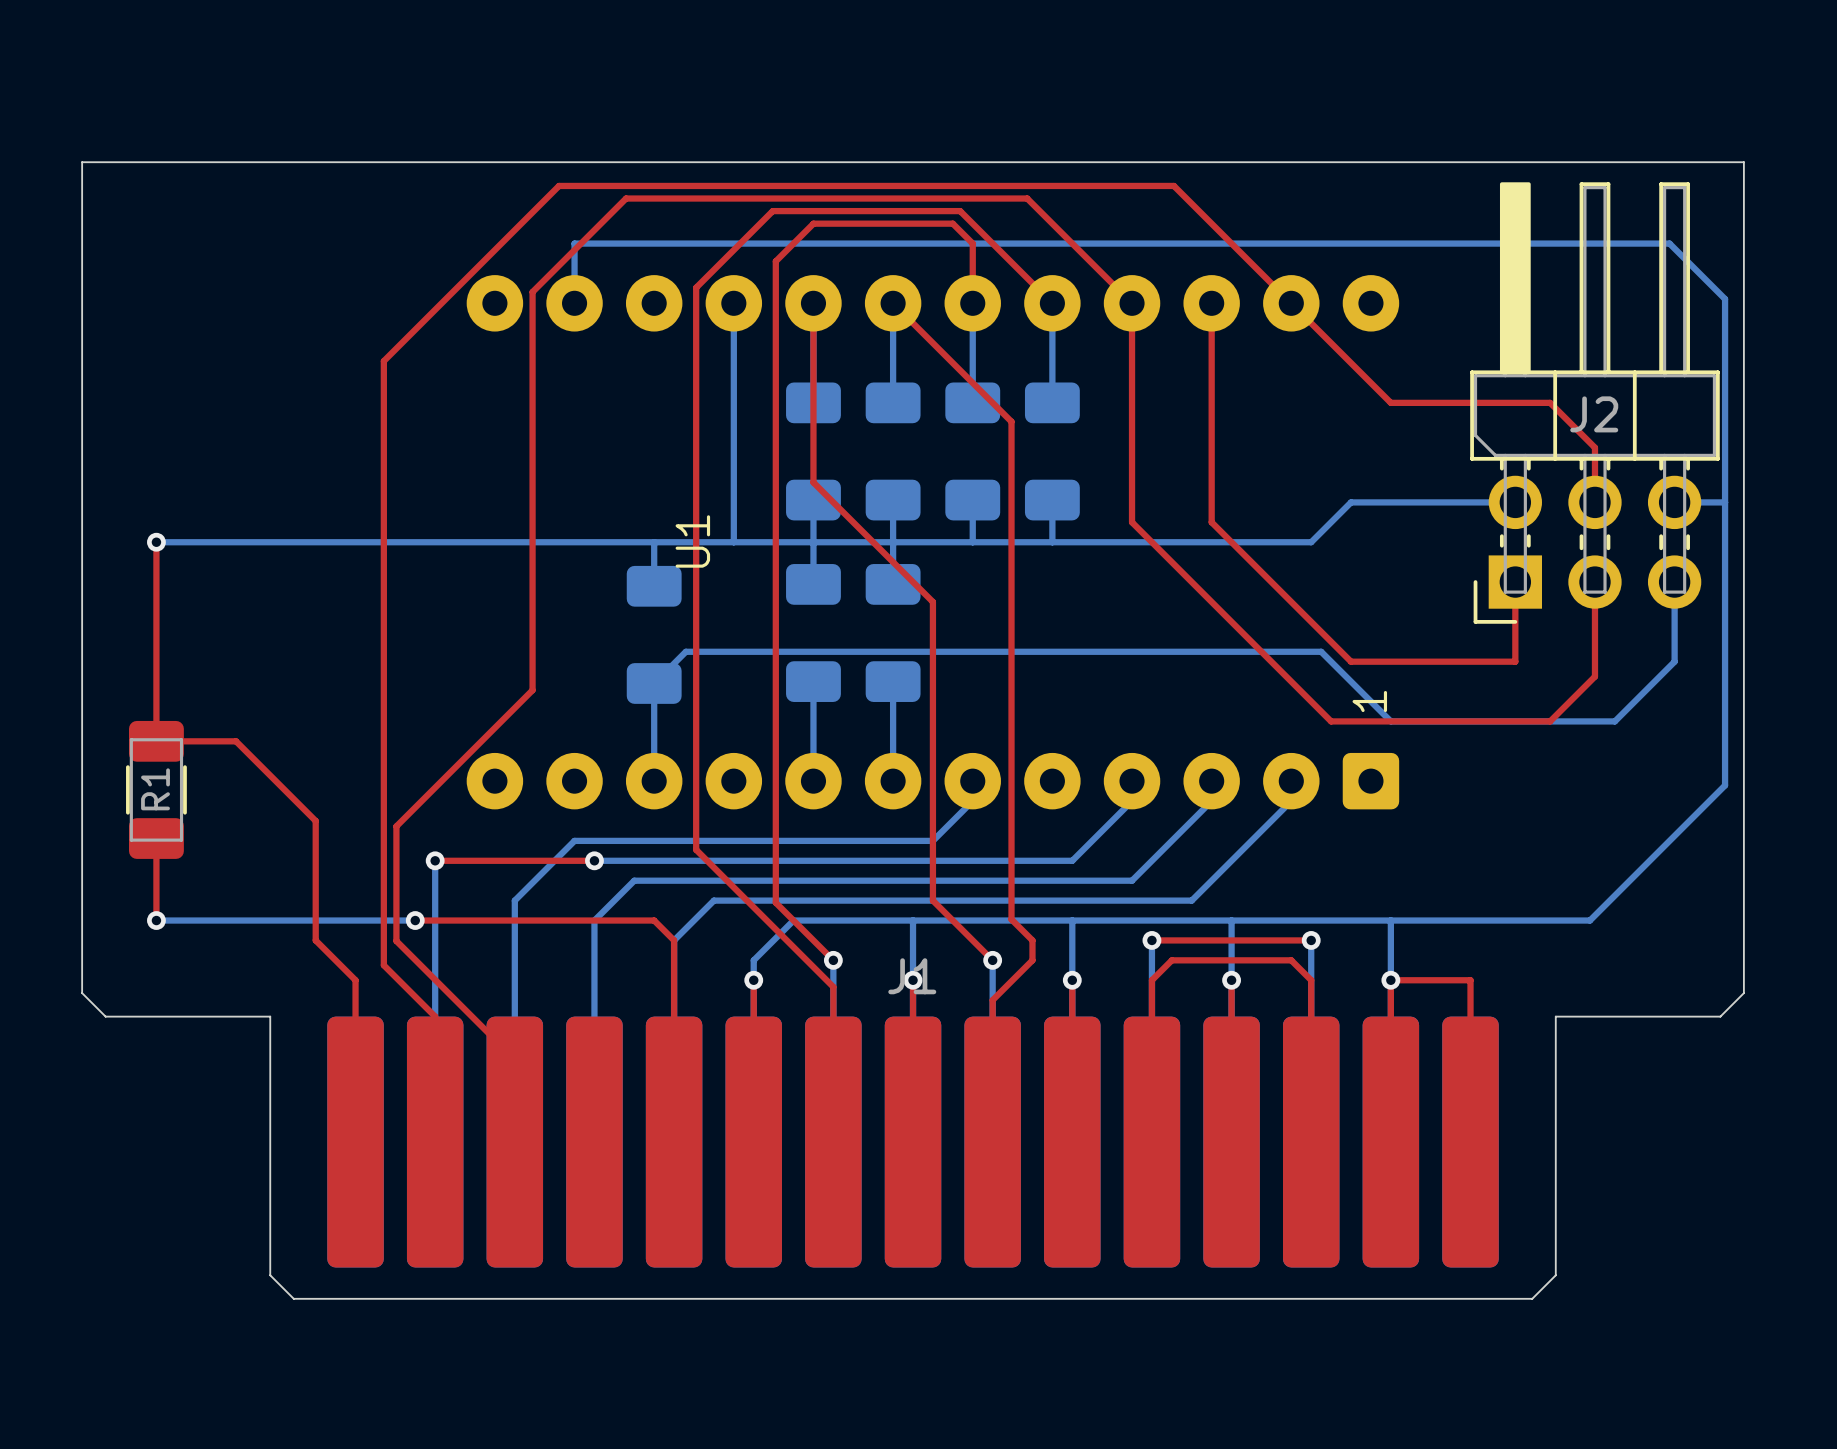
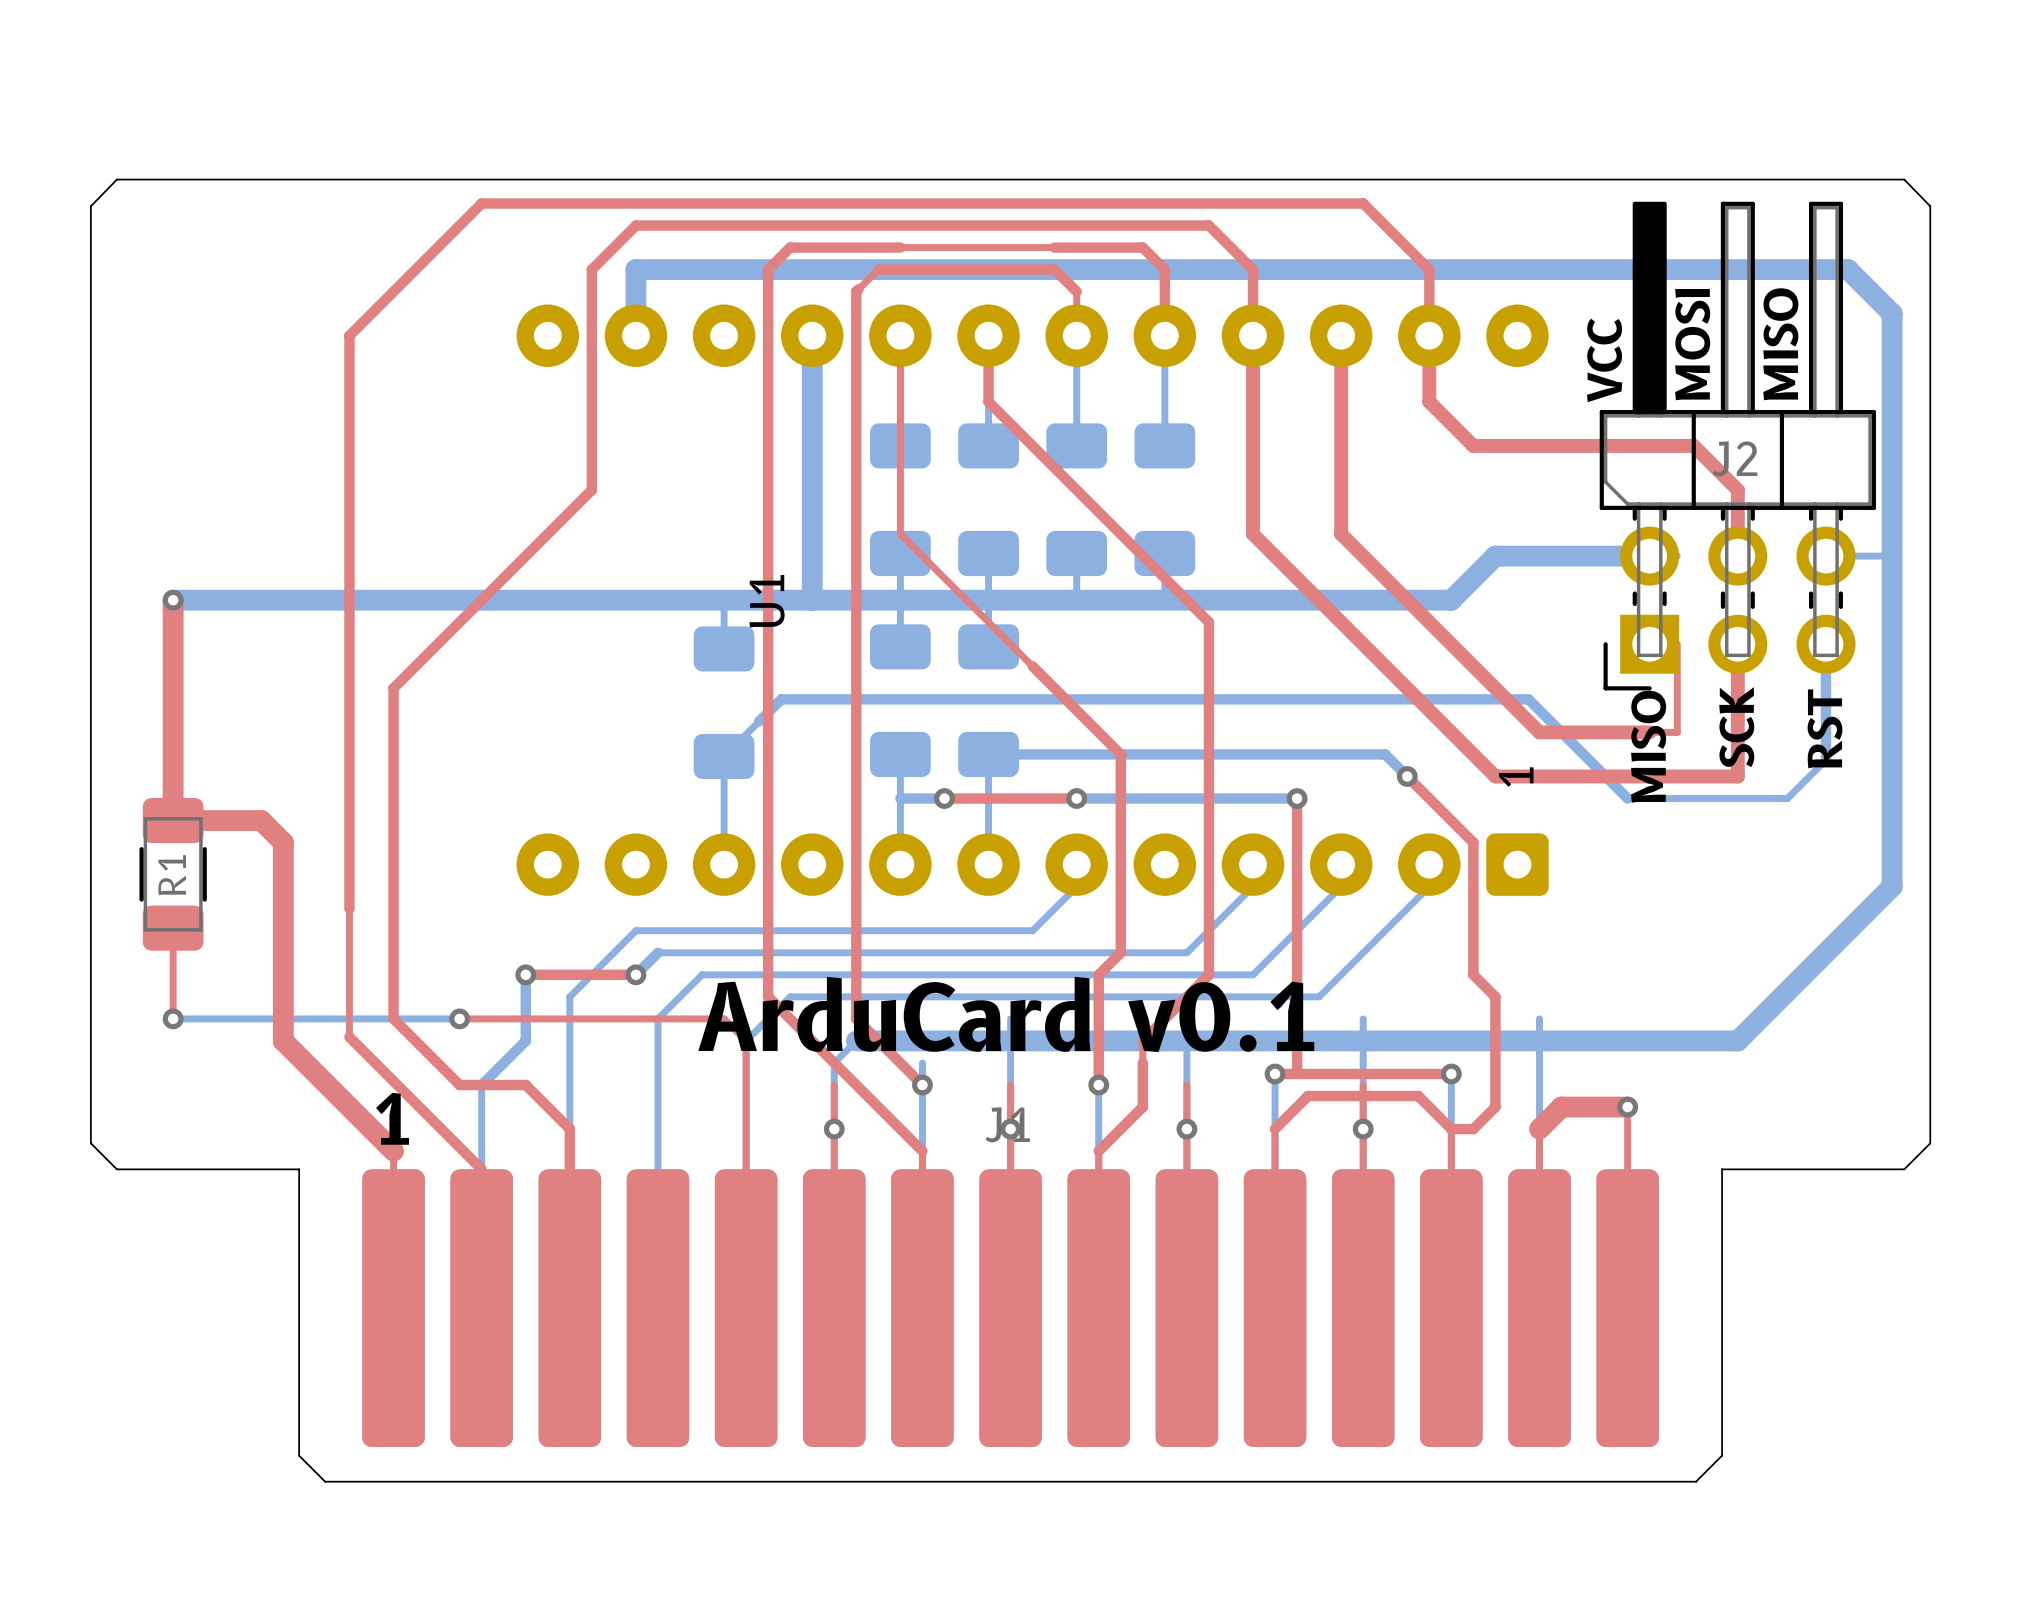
board edge: (105, 162) (82, 162) (82, 186) -> (116, 179) (90, 206)
board edge: (1720, 162) (1743, 162) (1743, 186) -> (1904, 179) (1930, 206)
top track: (813, 223) (793, 243) -> (1076, 291) (1054, 269) (878, 269)
top track: (952, 223) (972, 243) (972, 263) -> (1054, 247) (1142, 247) (1164, 269) (1164, 335)
top track: (775, 261) (775, 902) (833, 960) -> (858, 289) (856, 291) (856, 1018) (922, 1085)
bottom track: (1709, 283) (1725, 299) (1725, 785) (1709, 801) -> (1892, 313) (1892, 886)
bottom track width: thin (1709, 283) (1669, 243) (574, 243) (574, 303) -> thick (1892, 313) (1848, 269) (635, 269) (635, 335)
text: none -> MISO (1780, 344)
text: none -> MOSI (1692, 344)
bottom track width: thin (733, 303) (733, 542) -> thick (812, 335) (812, 600)
top track: (893, 303) (1011, 421) (1011, 919) (1032, 940) -> (988, 335) (988, 401) (1208, 622) (1208, 974) (1142, 1040)
top track: (1052, 303) (960, 211) (772, 211) (696, 287) (696, 849) (833, 986) (833, 1039) -> (900, 247) (790, 247) (768, 269) (768, 996) (922, 1151)
top track: (1132, 303) (1027, 198) (626, 198) (532, 292) (532, 690) (396, 826) (396, 941) (514, 1059) -> (1253, 335) (1253, 269) (1208, 225) (635, 225) (591, 269) (591, 489) (393, 688) (393, 1018) (459, 1085) (525, 1085) (569, 1129) (569, 1172)
top track width: thin (1132, 303) (1132, 482) -> thick (1253, 335) (1253, 534)
top track width: thin (1211, 303) (1211, 482) -> thick (1341, 335) (1341, 534)
text: none -> VCC (1604, 360)
top track: (1390, 402) (1173, 185) (559, 185) (383, 361) (383, 965) (435, 1016) (435, 1056) -> (1539, 445) (1473, 445) (1429, 401) (1429, 269) (1363, 203) (481, 203) (349, 335) (349, 908)
top track width: thin (1390, 402) (1530, 402) -> thick (1539, 445) (1693, 445)
top track: (1530, 402) (1550, 402) (1594, 447) (1594, 502) -> (1693, 445) (1737, 489) (1737, 556)
J2 position: (1594, 403) -> (1737, 446)
top track: (1132, 482) (1132, 522) (1331, 721) (1550, 721) (1594, 676) (1594, 582) (1589, 577) -> (1253, 534) (1495, 776) (1737, 776) (1737, 644)
top track: (1211, 482) (1211, 522) (1351, 661) (1390, 661) -> (1341, 534) (1539, 732)
bottom track width: thin (1490, 502) (1351, 502) (1311, 542) (156, 542) -> thick (1649, 556) (1495, 556) (1451, 600) (173, 600)
bottom track: (1709, 502) (1725, 502) -> none
top track width: thin (156, 542) (156, 741) (236, 741) (255, 761) -> thick (173, 600) (173, 820) (261, 820) (283, 842)
bottom track: (1674, 582) (1674, 661) (1649, 686) -> (1826, 644) (1826, 760)
top track: (932, 601) (932, 900) (992, 960) -> (1032, 666) (1120, 754) (1120, 952) (1098, 974) (1098, 1085)
bottom track: (685, 651) (1321, 651) (1390, 721) (1470, 721) -> (759, 721) (781, 699) (1528, 699) (1627, 798)
top track width: thin (1390, 661) (1490, 661) -> thick (1539, 732) (1649, 732)
text: none -> RST (1825, 728)
text: none -> SCK (1736, 727)
bottom track: none -> (988, 754) (1385, 754) (1407, 776)
text: none -> MISO (1648, 746)
via: none -> (1407, 776)
bottom track: none -> (900, 798) (944, 798)
top track: none -> (944, 798) (1076, 798)
via: none -> (944, 798)
bottom track: none -> (1076, 798) (1297, 798)
via: none -> (1076, 798)
top track: none -> (1297, 798) (1297, 1074)
via: none -> (1297, 798)
top track: (255, 761) (315, 820) -> (283, 842) (283, 1040) (393, 1151)
bottom track width: thin (1709, 801) (1589, 920) -> thick (1892, 886) (1759, 1018)
bottom track: (435, 860) (435, 980) -> (525, 974) (525, 1040) (481, 1085)
top track: (435, 860) (594, 860) -> none
via position: (435, 860) -> (525, 974)
bottom track: none -> (657, 952) (635, 974)
via position: (594, 860) -> (635, 974)
top track: none -> (525, 974) (635, 974)
text: none -> ArduCard v0.1 (1006, 1014)
bottom track: (1072, 920) (1072, 940) -> none
bottom track: (1589, 920) (793, 920) (773, 940) -> (1759, 1018) (1737, 1040) (856, 1040)
top track: (315, 936) (315, 940) (355, 980) (355, 1039) -> (349, 1037) (481, 1169)
bottom track: (1151, 940) (1151, 970) -> none
top track: (1151, 940) (1311, 940) -> (1275, 1074) (1451, 1074)
via position: (1151, 940) -> (1275, 1074)
bottom track: (1311, 940) (1311, 970) -> none
via position: (1311, 940) -> (1451, 1074)
via position: (833, 960) -> (922, 1085)
via position: (992, 960) -> (1098, 1085)
top track: (1032, 960) (992, 1000) (992, 1039) -> (1142, 1062) (1142, 1107) (1098, 1151)
via: (753, 980) -> none
via: (913, 980) -> none
via: (1072, 980) -> none
via: (1231, 980) -> none
via: (1390, 980) -> none
board edge: (82, 993) (105, 1016) (270, 1016) (270, 1056) -> (90, 1099) (90, 1143) (116, 1169) (299, 1169)
board edge: (1743, 993) (1720, 1016) (1555, 1016) (1555, 1056) -> (1930, 1099) (1930, 1143) (1904, 1169) (1722, 1169)
top track: (1470, 1000) (1470, 980) (1390, 980) (1390, 1020) -> (1627, 1107) (1561, 1107) (1539, 1129)
via: none -> (1627, 1107)
text: none -> 1 (392, 1118)
via: none -> (834, 1129)
via: none -> (1010, 1129)
via: none -> (1186, 1129)
top track: (1151, 1020) (1151, 980) (1171, 960) (1291, 960) (1311, 980) (1311, 1020) -> (1275, 1129) (1308, 1096) (1418, 1096) (1451, 1129) (1473, 1129) (1495, 1107) (1495, 996) (1473, 974) (1473, 842) (1407, 776)
via: none -> (1363, 1129)
J1 position: (913, 1142) -> (1010, 1308)
board edge: (270, 1275) (293, 1298) (1532, 1298) (1555, 1275) -> (299, 1411) (299, 1455) (325, 1481) (1696, 1481) (1722, 1455) (1722, 1411)

